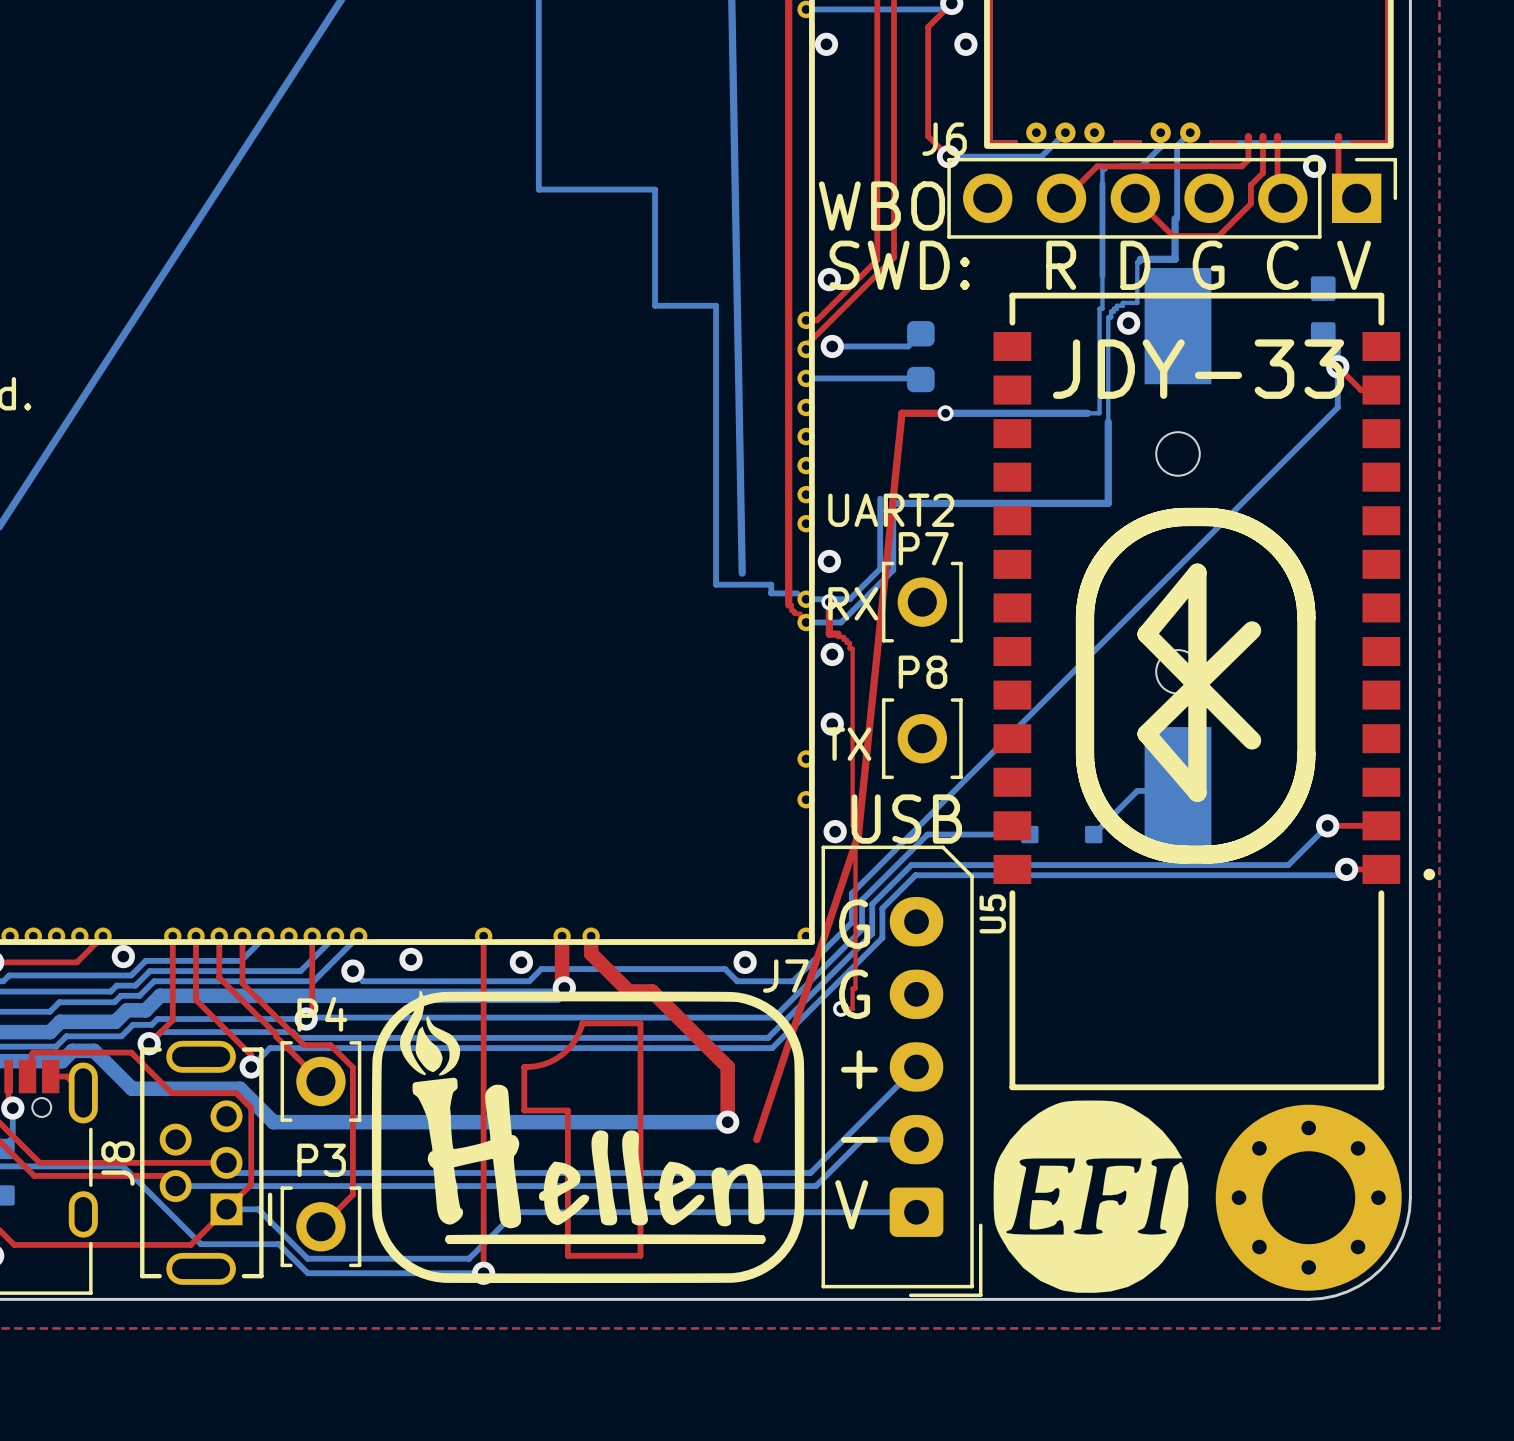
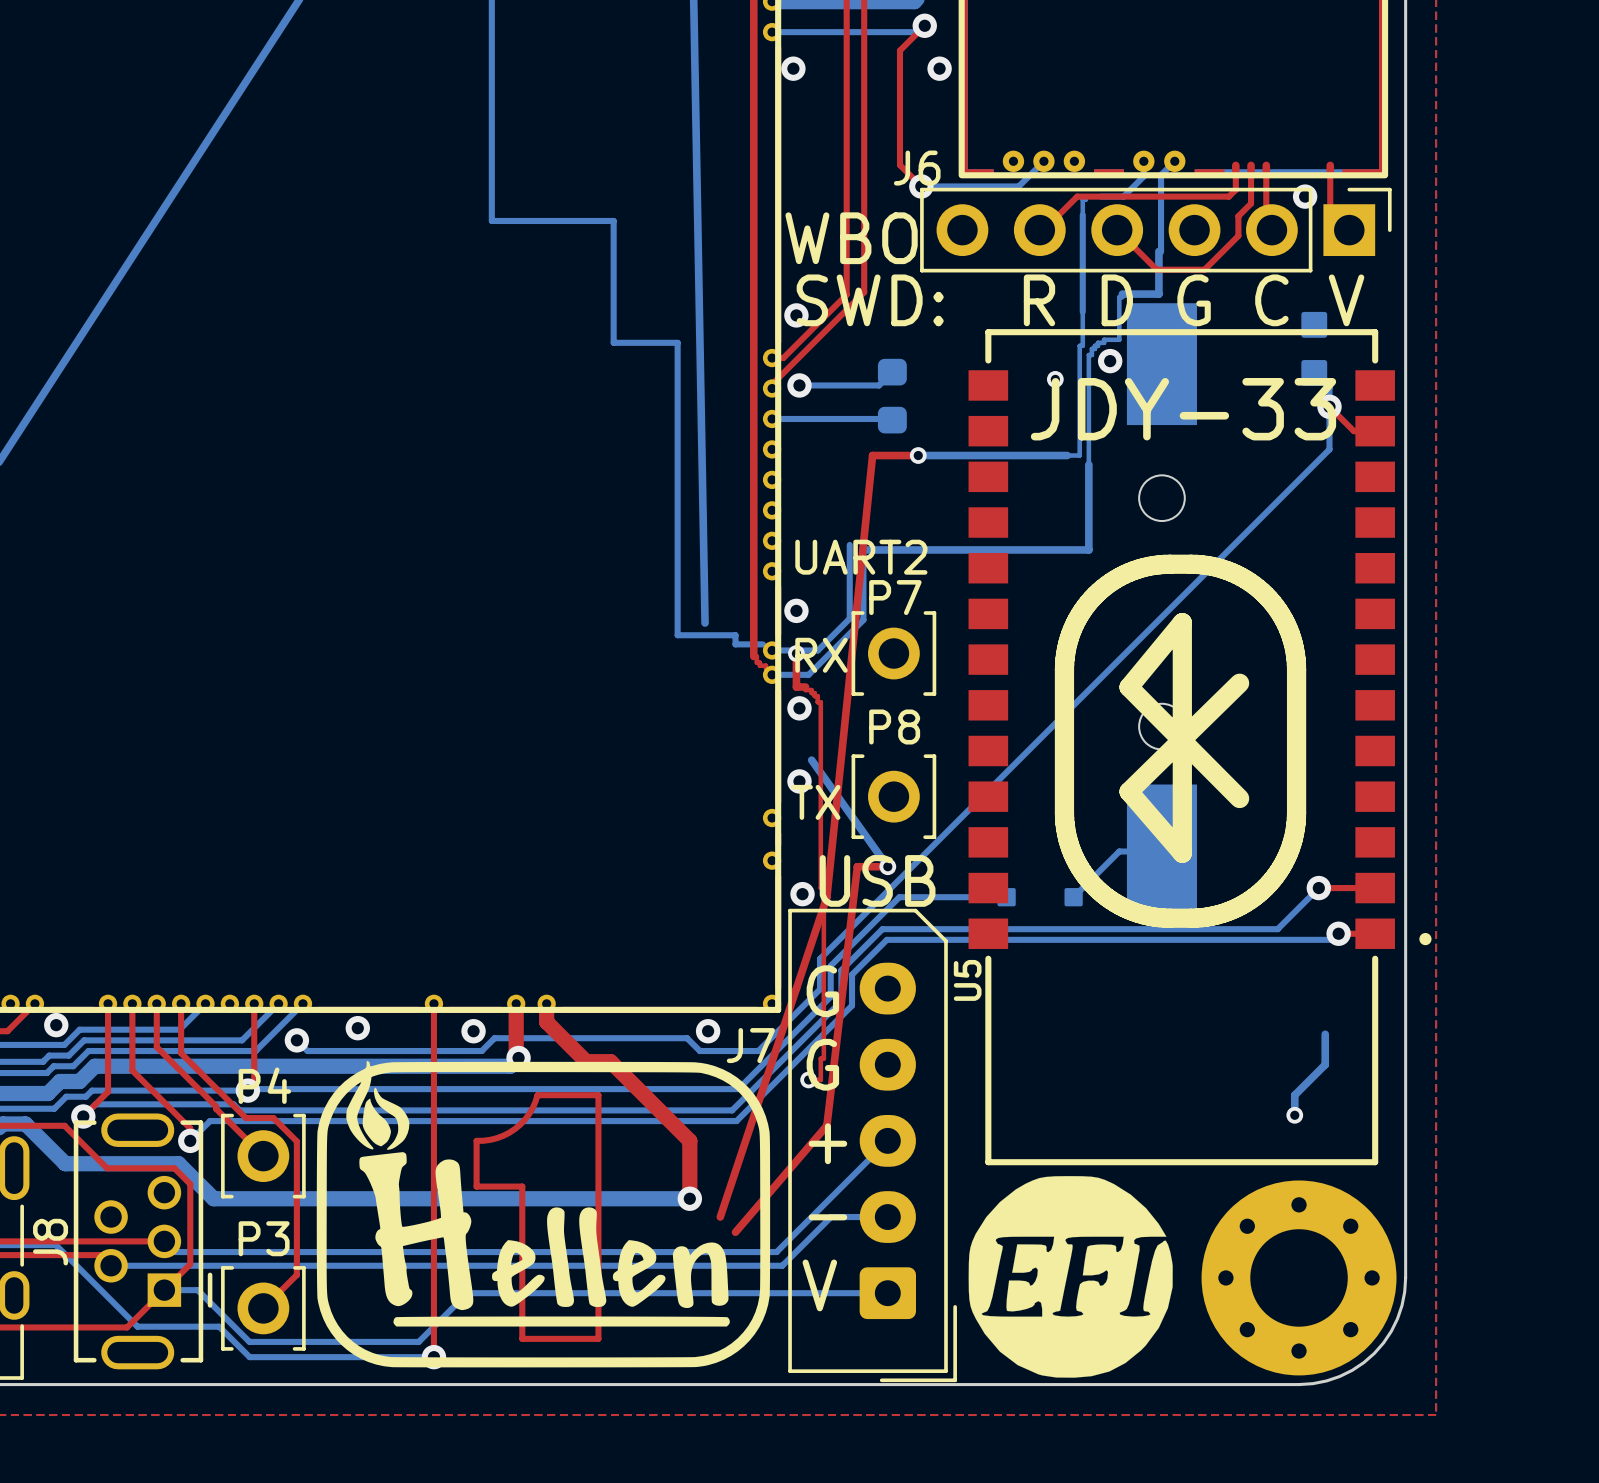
via: none -> (1055, 379)
bottom track: none -> (811, 760) (887, 866)
top track: none -> (887, 866) (857, 866) (826, 1125) (735, 1232)
via: none -> (887, 866)
bottom track: none -> (1325, 1034) (1325, 1064) (1294, 1095) (1294, 1115)
via: none -> (1294, 1115)

